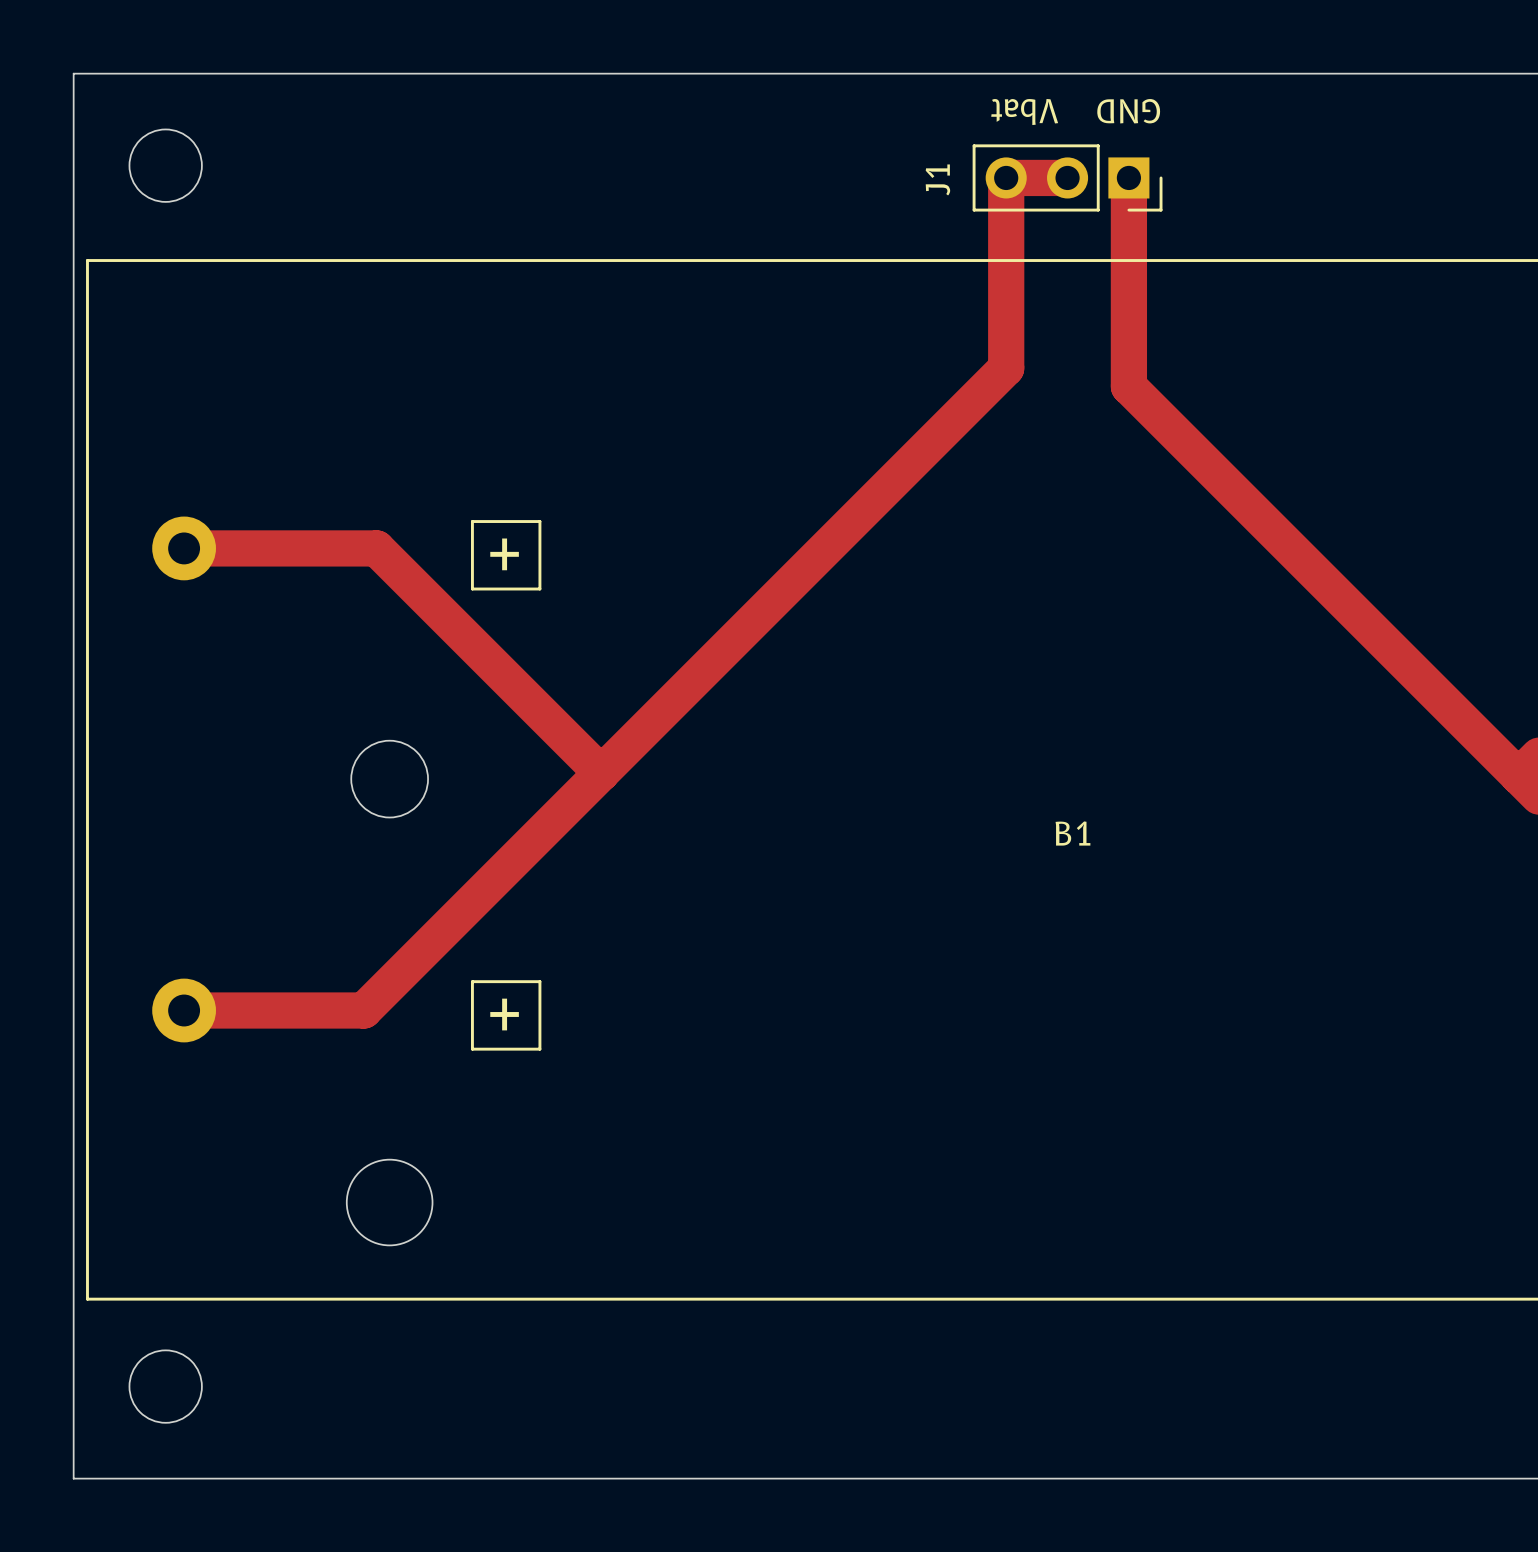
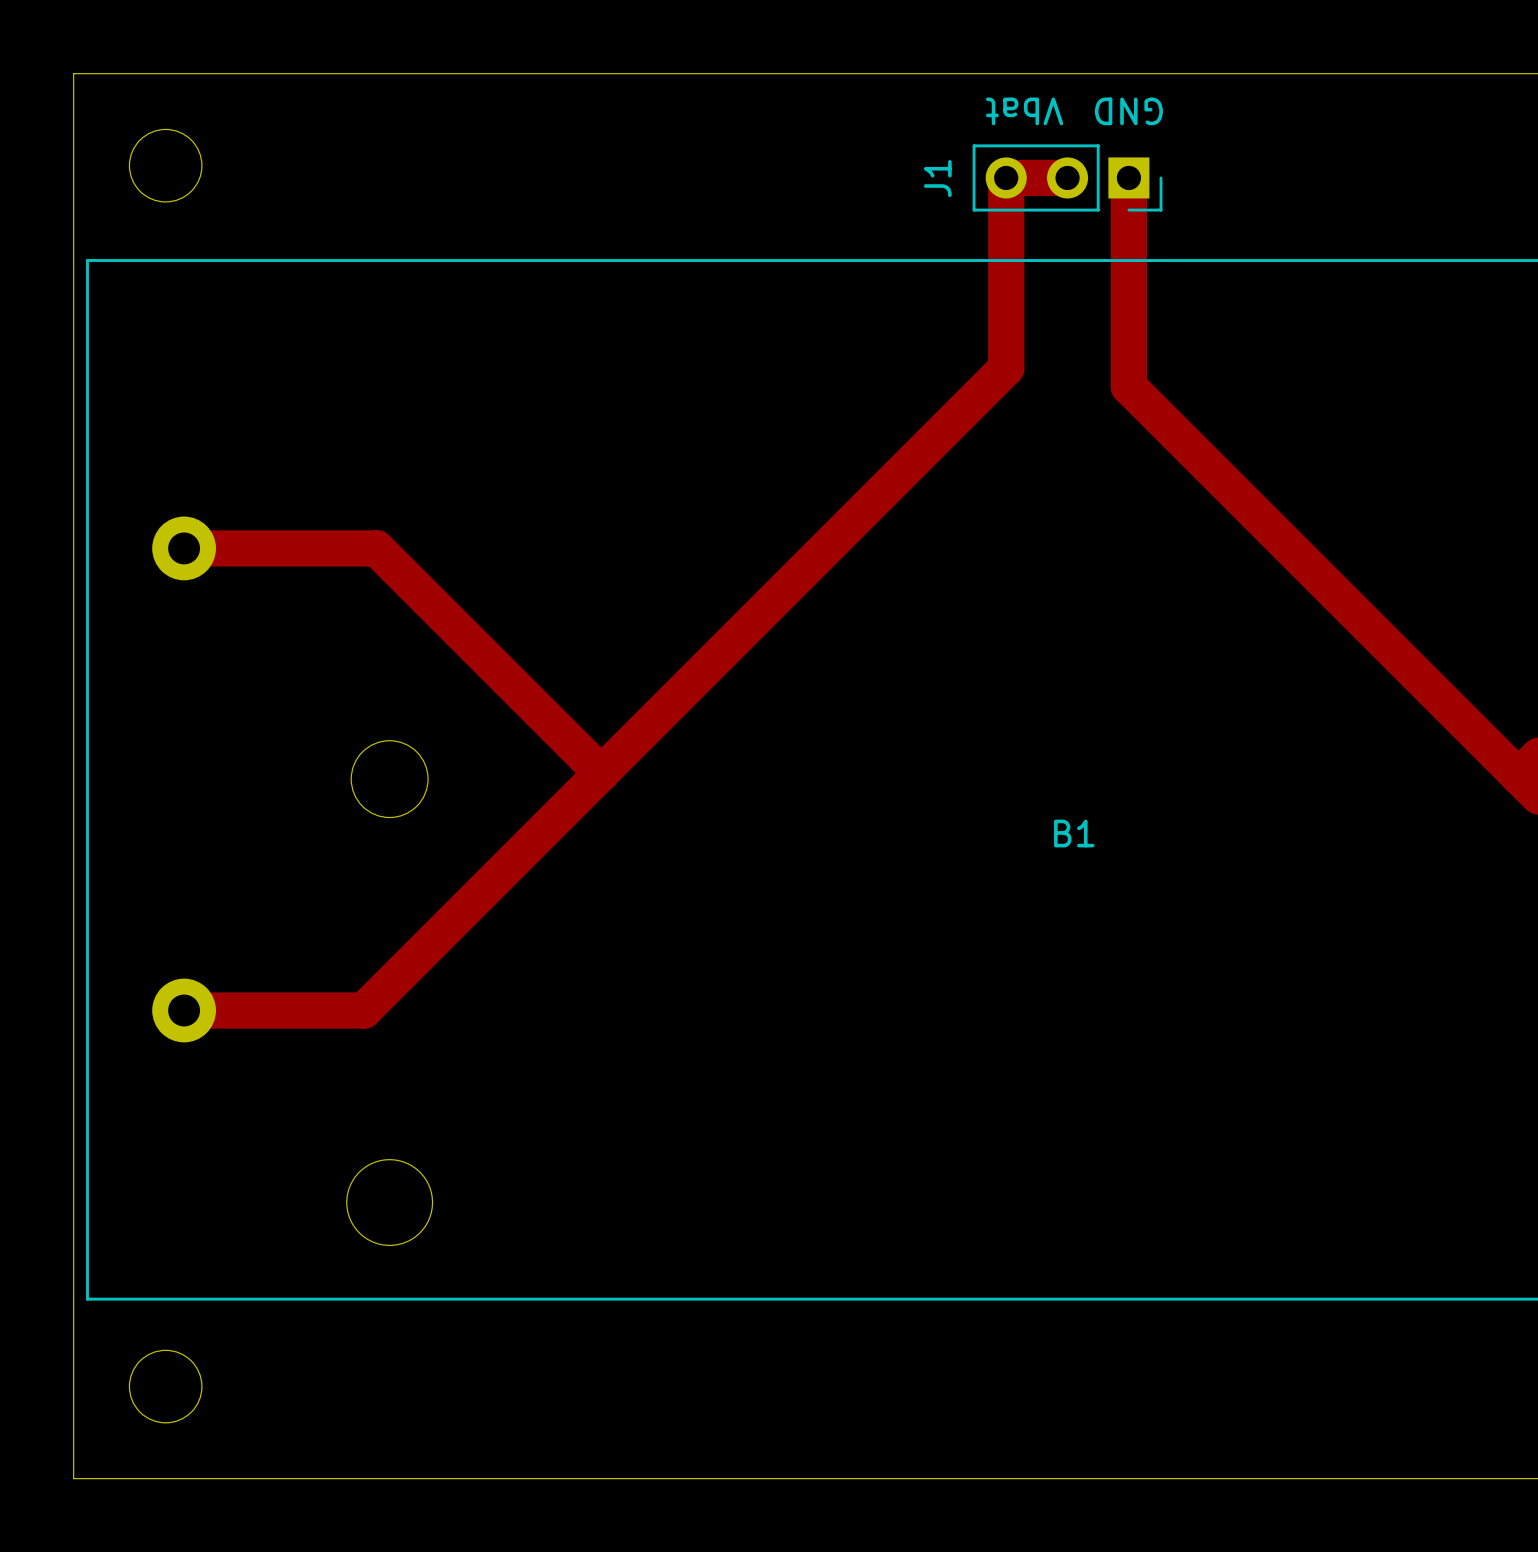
line: (472, 521) (472, 589) (539, 589) (539, 521) (472, 521) -> none
text: + (504, 554) -> none
line: (472, 981) (472, 1049) (539, 1049) (539, 981) (472, 981) -> none
text: + (504, 1014) -> none

